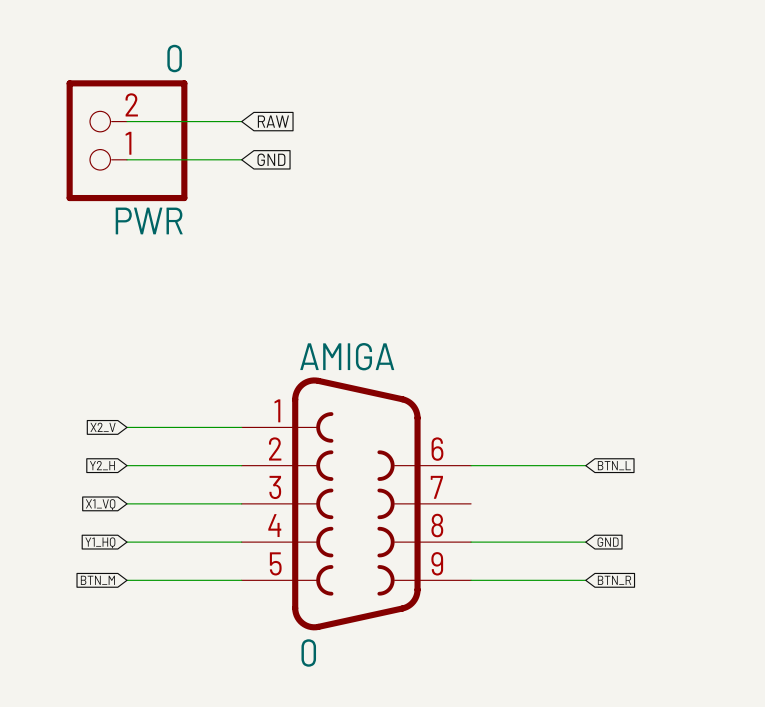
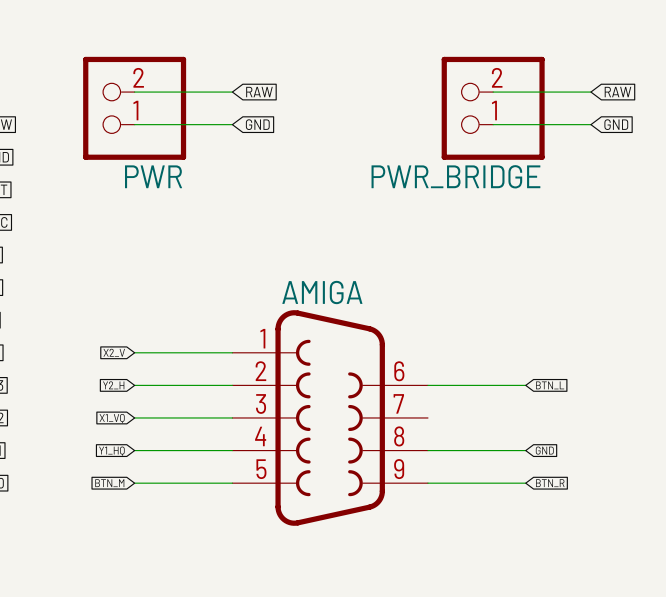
PWR value: 0 (174, 58) -> none
wire: none -> (493, 92) (590, 92)
global label: none -> RAW (617, 92)
PWR_BRIDGE: none -> (493, 108)
wire: none -> (493, 124) (590, 124)
global label: none -> GND (616, 124)
AMIGA value: 0 (308, 652) -> none

